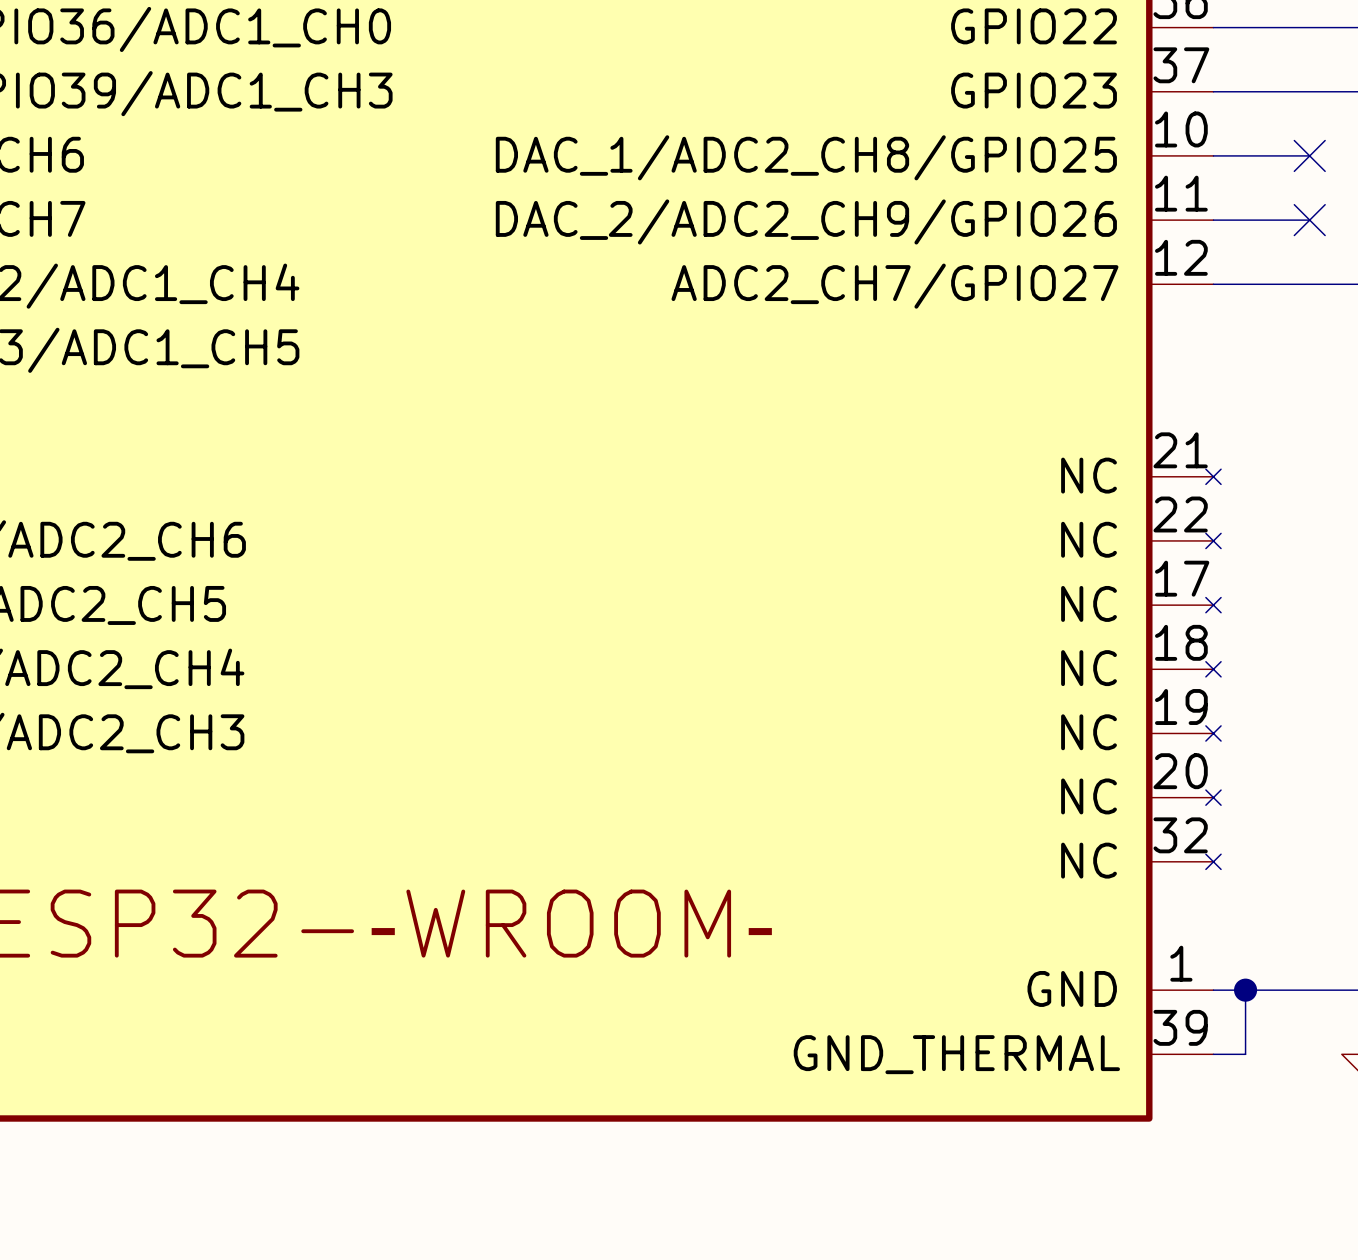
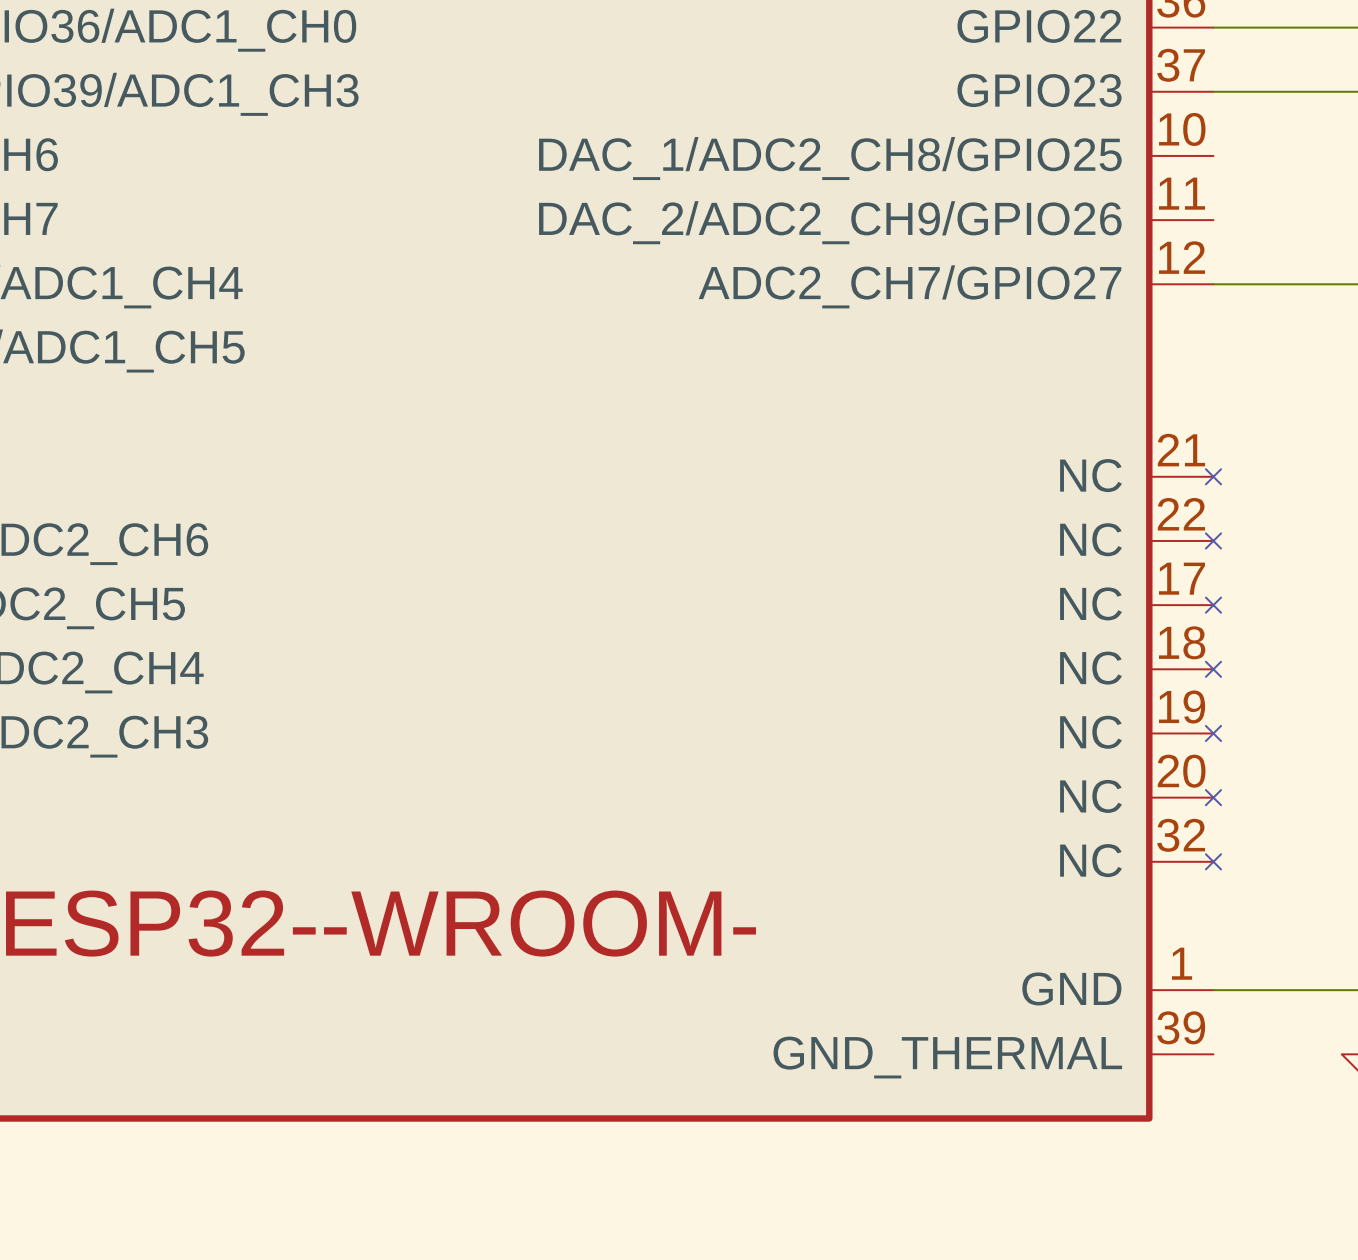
wire: (1213, 155) (1309, 155) -> none
no-connect mark: (1309, 155) -> none
wire: (1213, 220) (1309, 220) -> none
no-connect mark: (1309, 220) -> none
wire: (1245, 990) (1245, 1054) (1213, 1054) -> none
junction: (1245, 990) -> none

